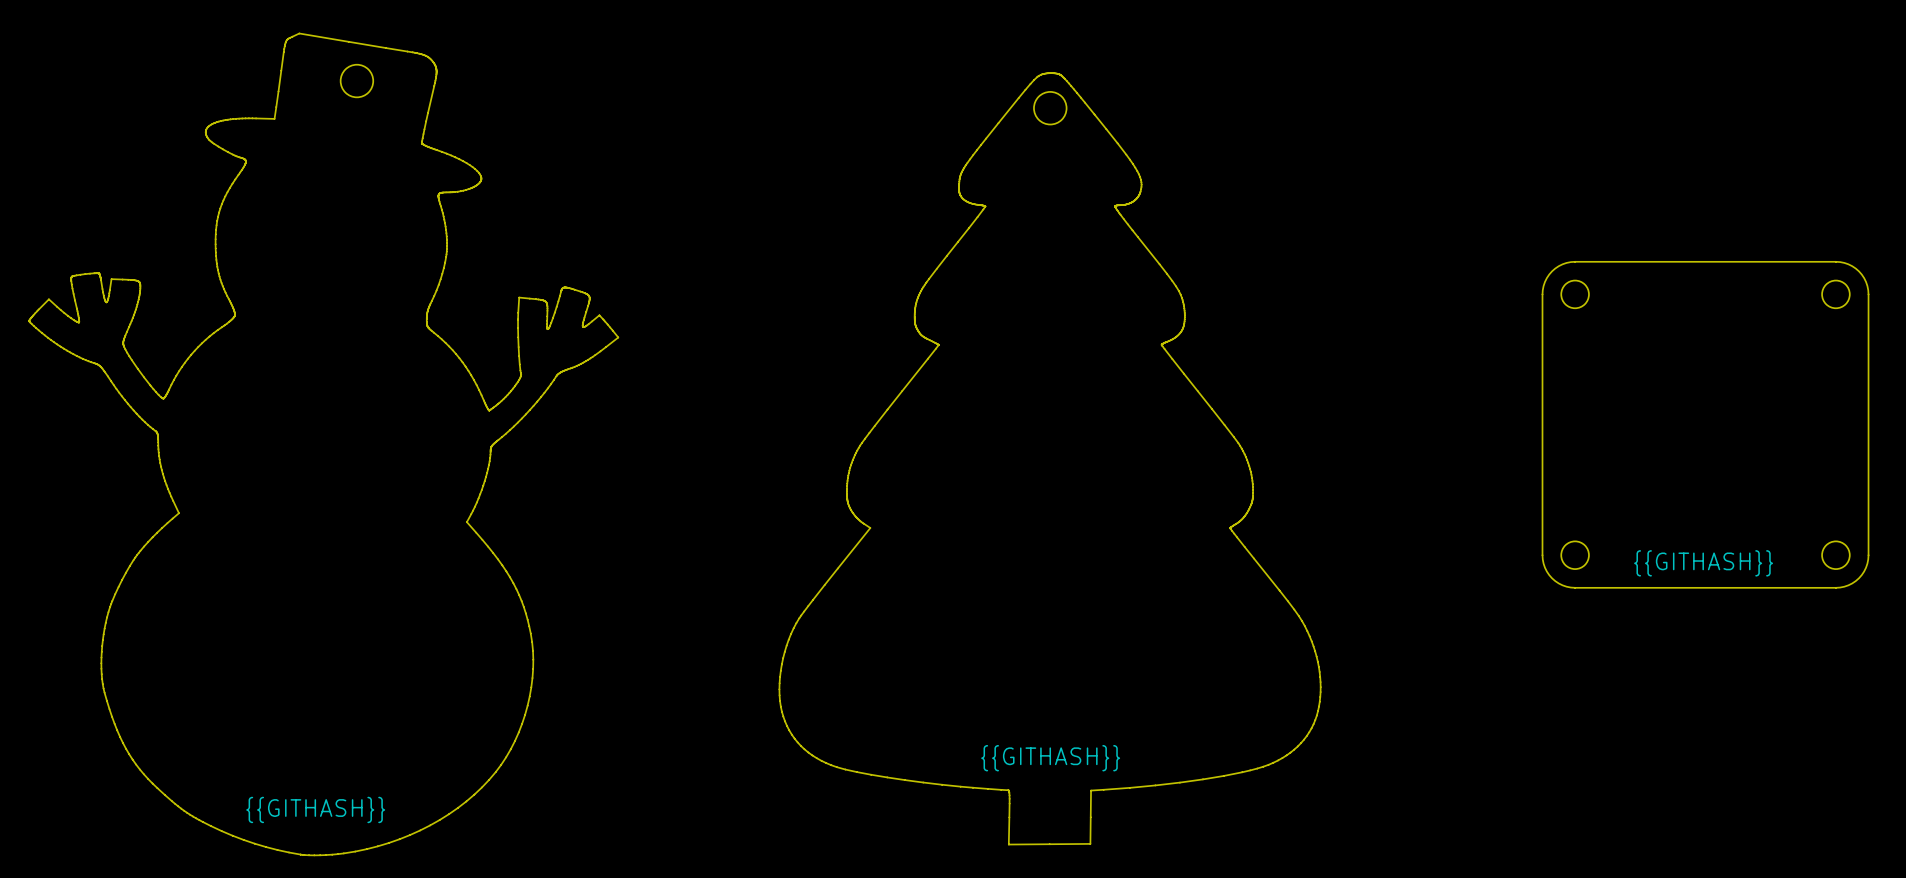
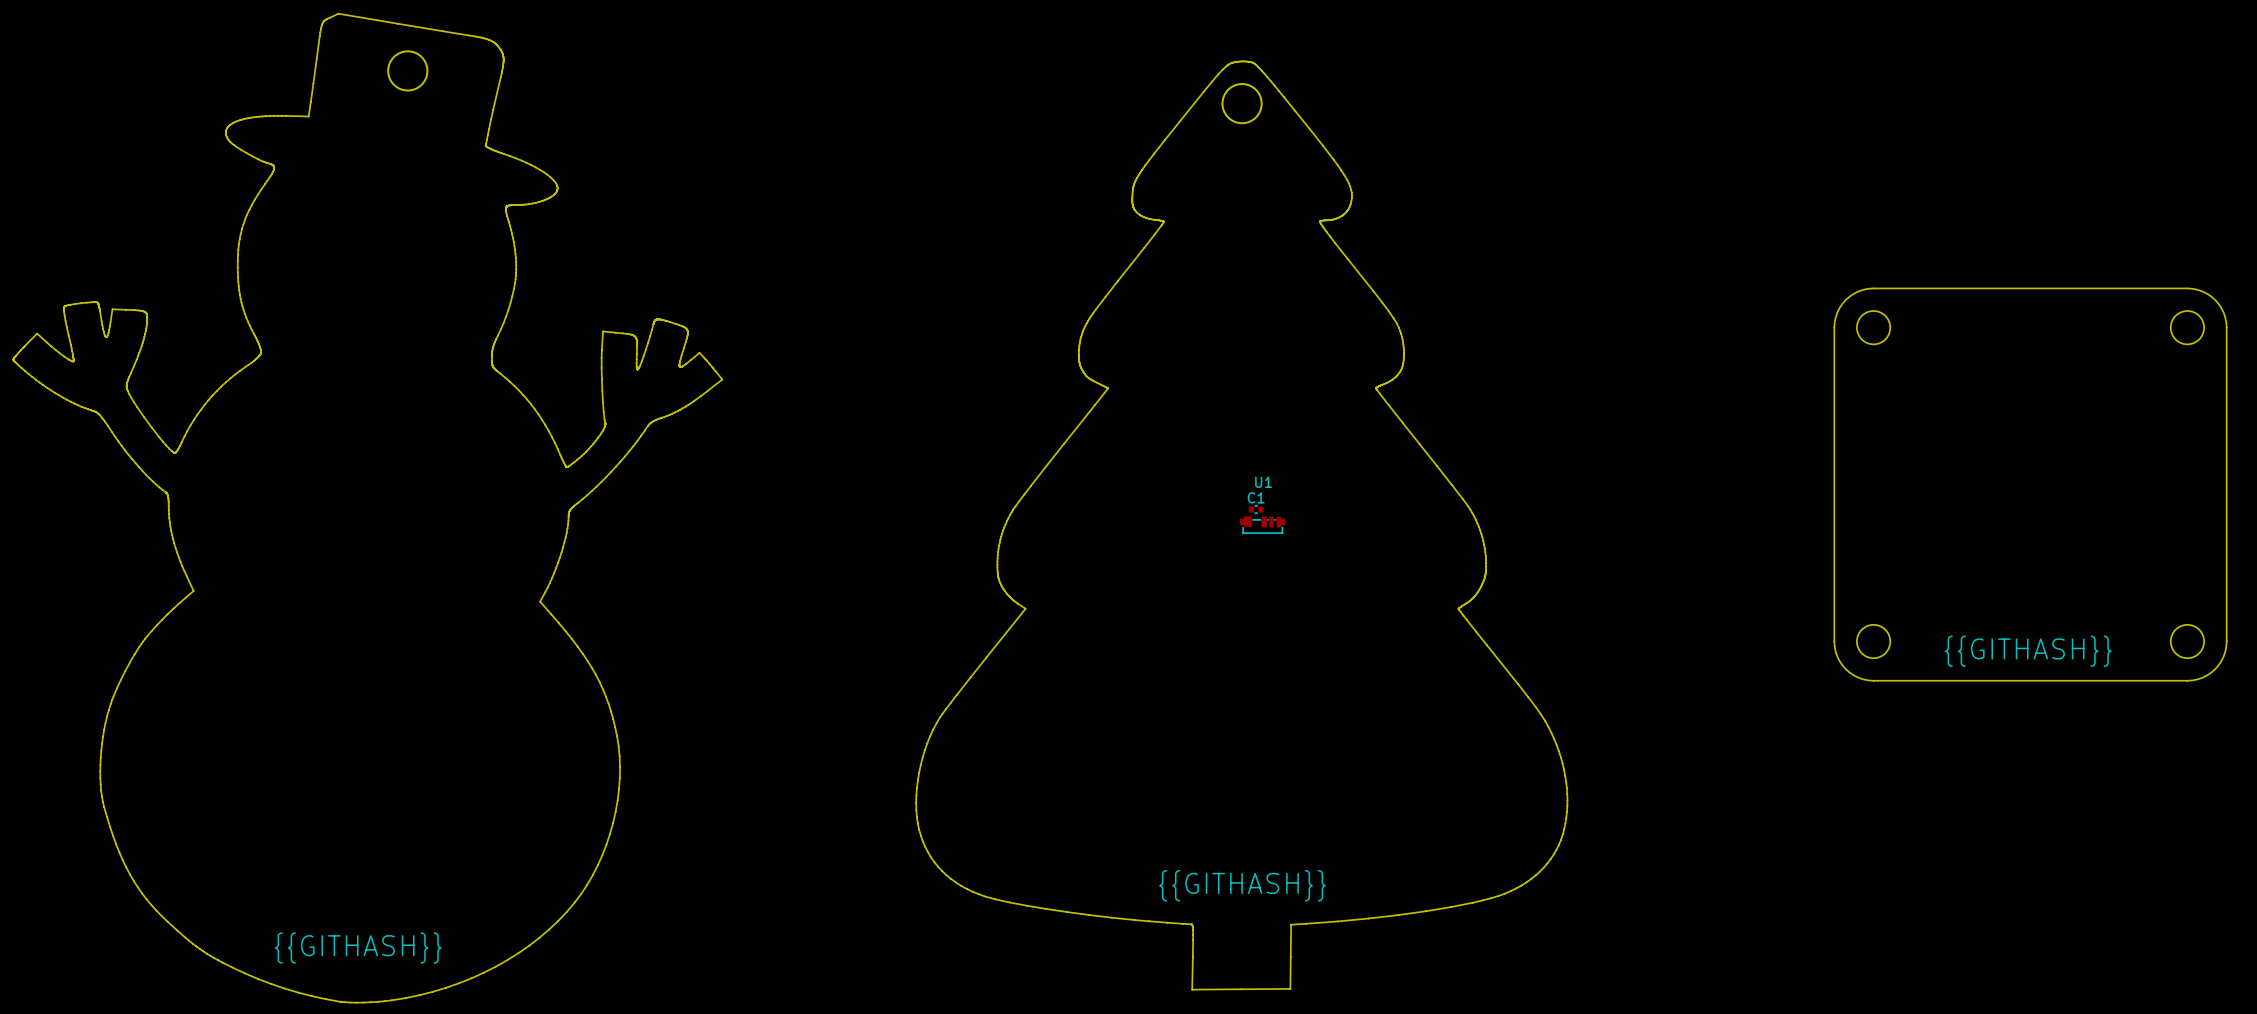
C1: none -> (1256, 509)
U1: none -> (1262, 525)

